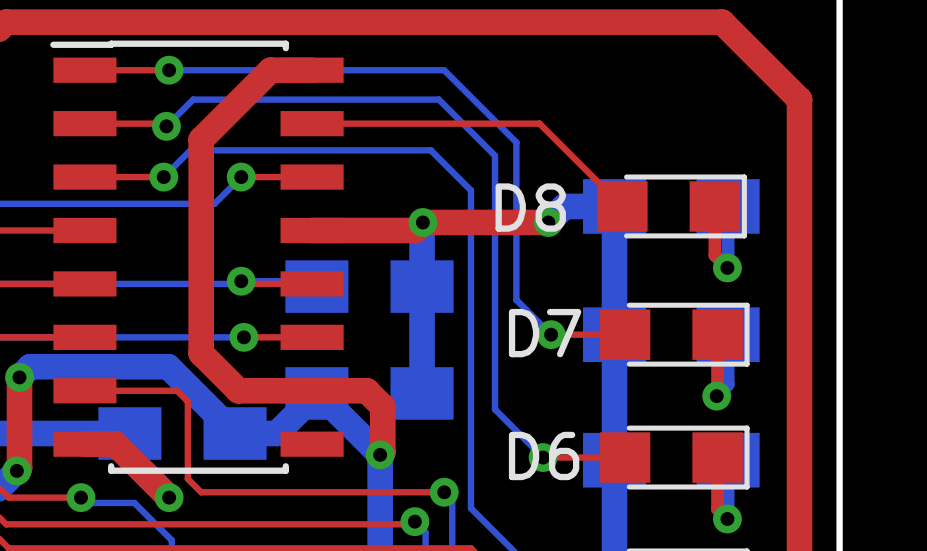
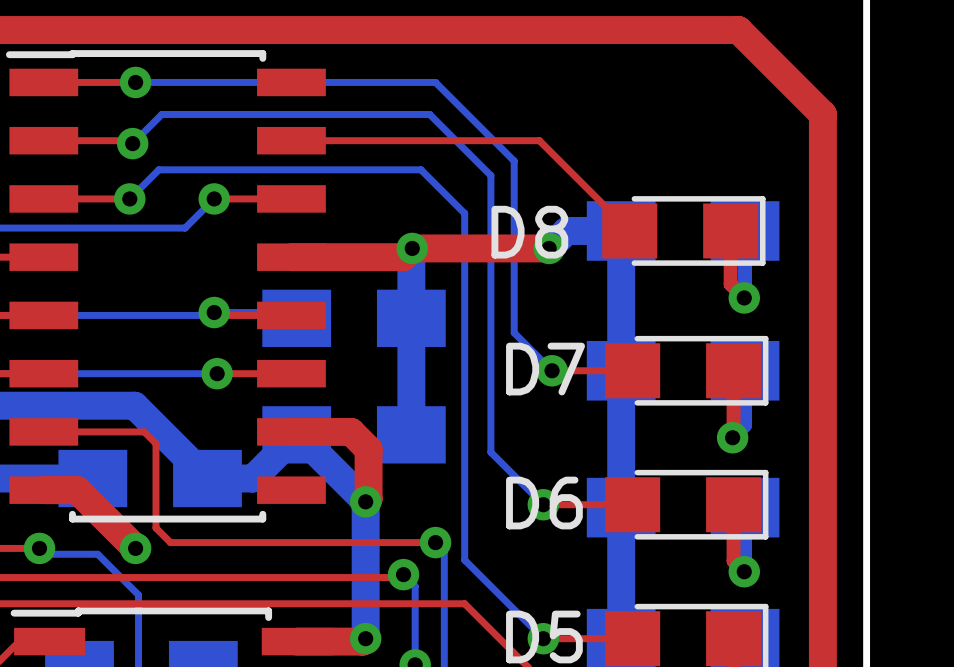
top track: (312, 70) (270, 70) (201, 139) (201, 353) (238, 390) (312, 390) -> none

